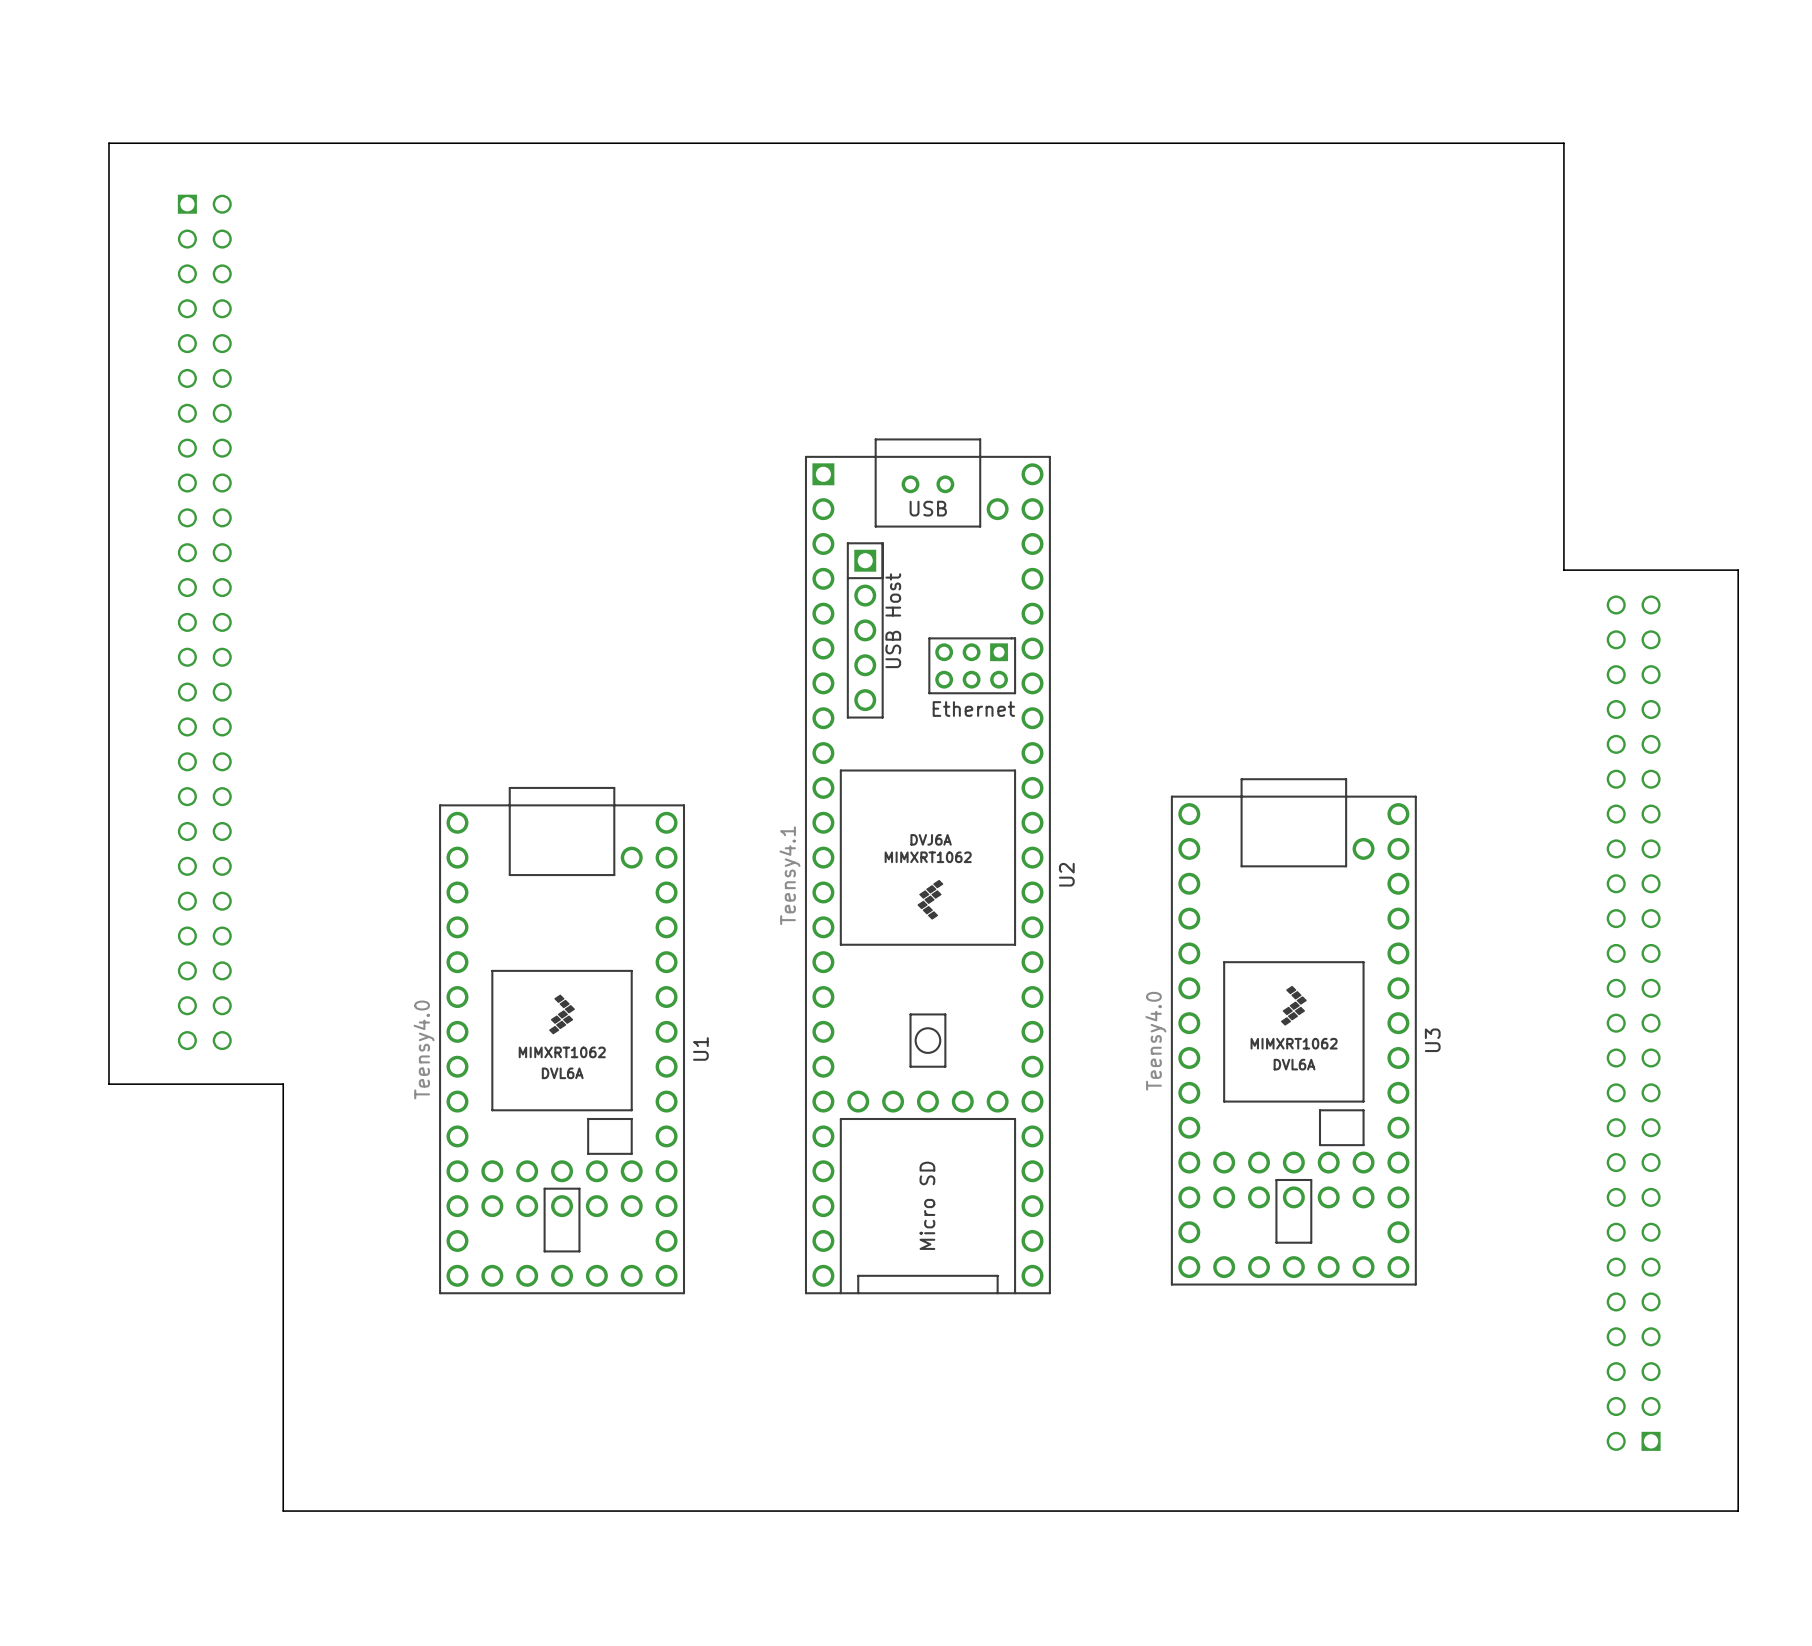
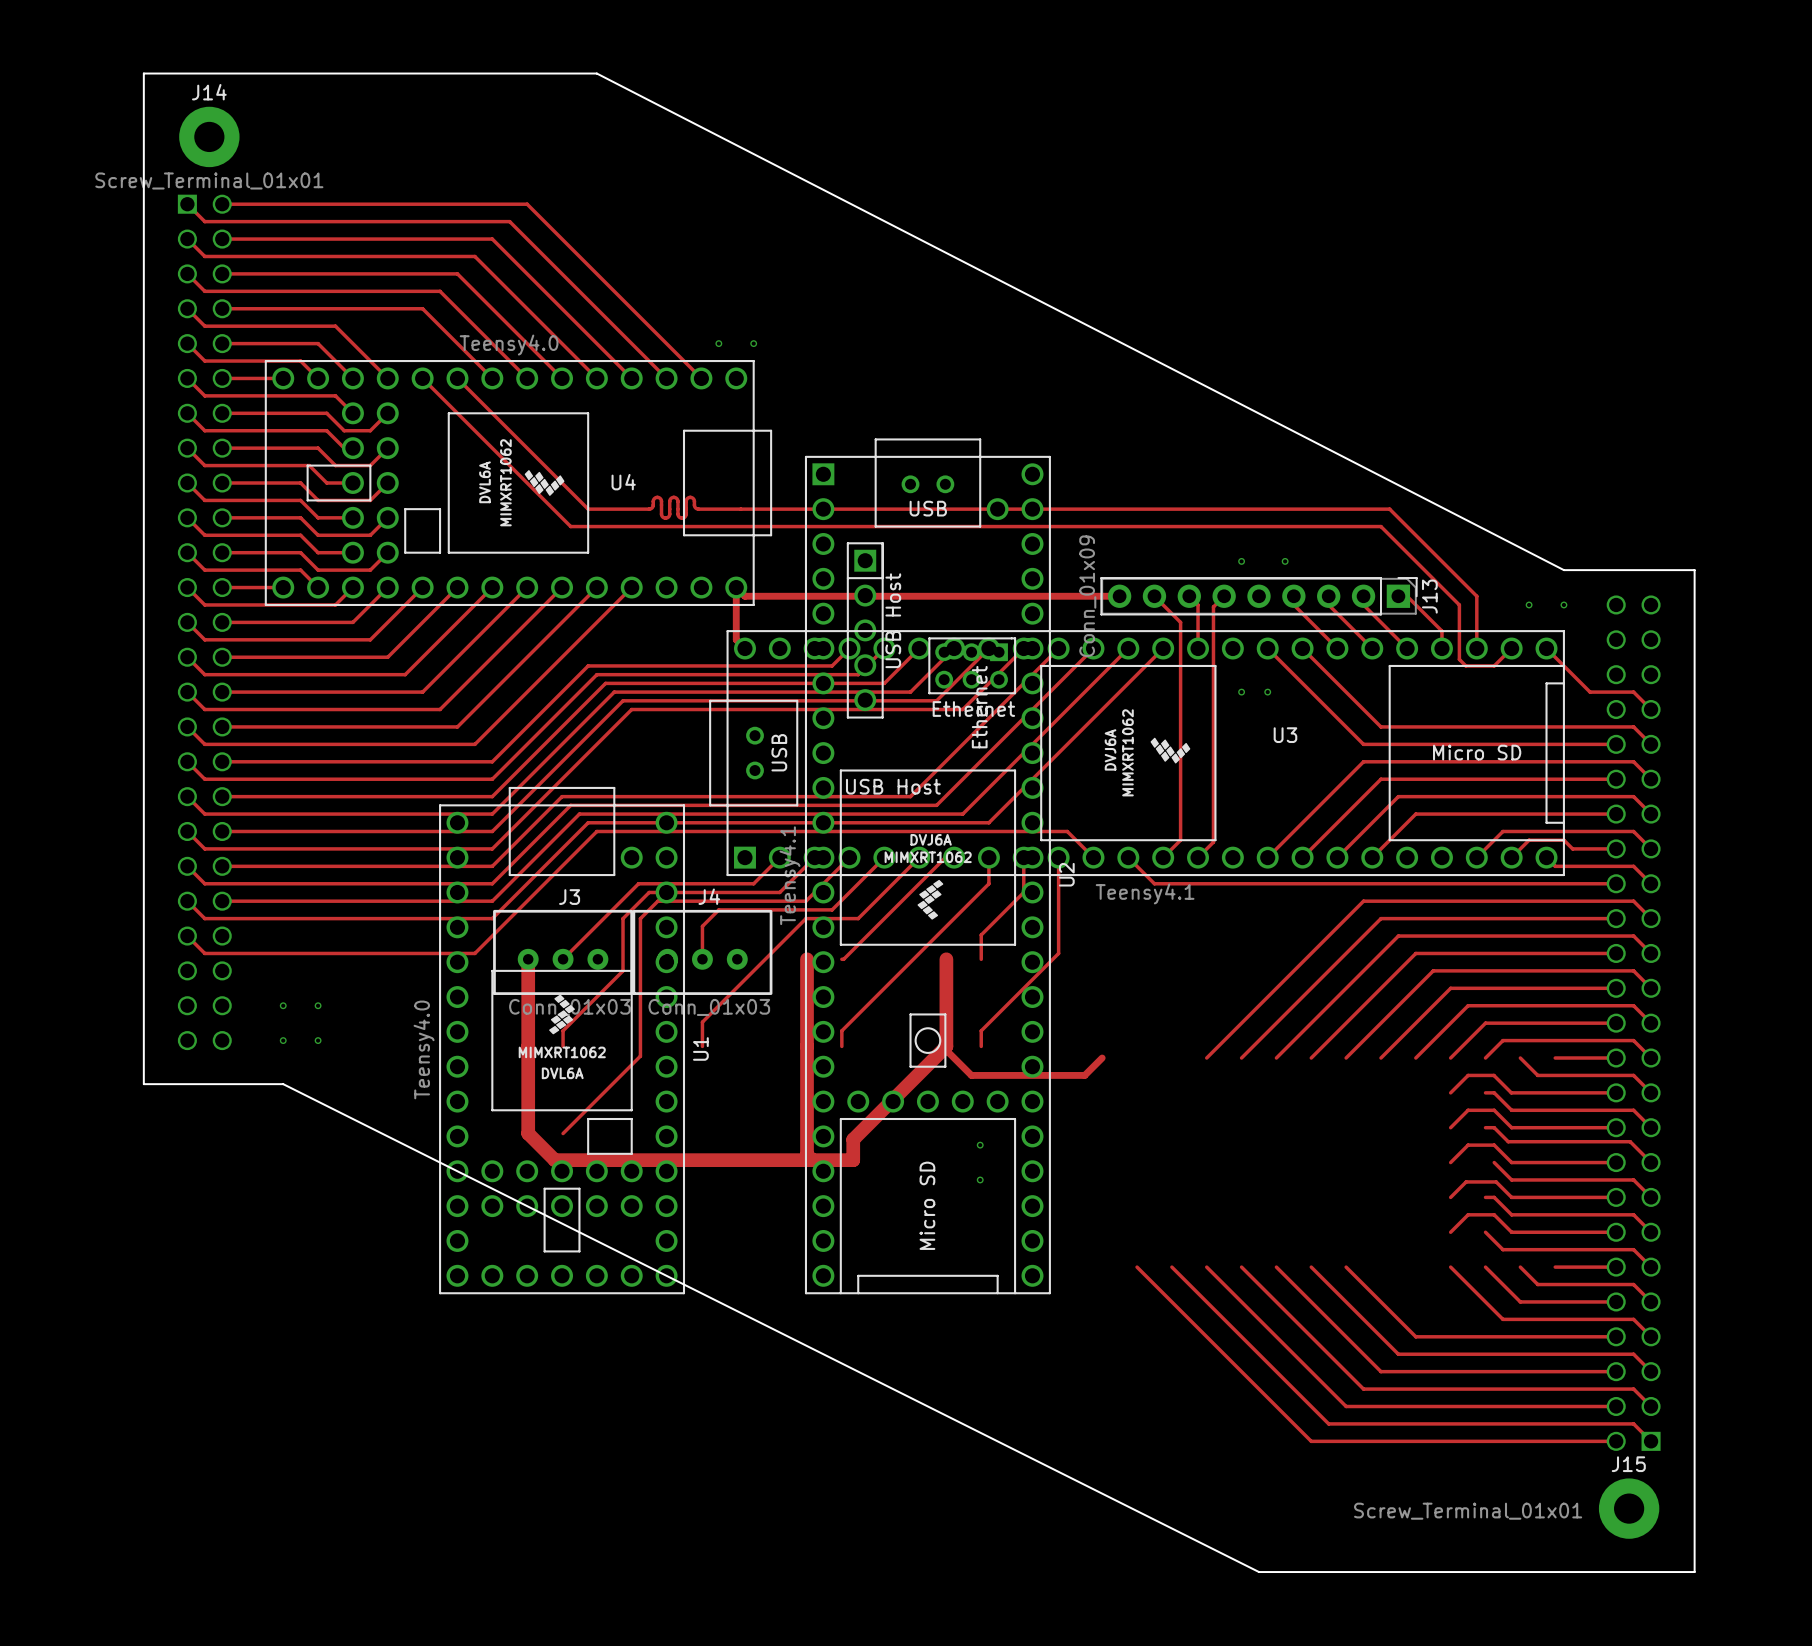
J14: none -> Screw_Terminal_01x01 (209, 136)
track: none -> (187, 204) (204, 221) (509, 221) (666, 378)
track: none -> (222, 204) (527, 204) (701, 378)
track: none -> (187, 239) (204, 256) (474, 256) (596, 378)
track: none -> (222, 239) (492, 239) (631, 378)
track: none -> (187, 273) (204, 291) (440, 291) (527, 378)
track: none -> (222, 273) (457, 273) (562, 378)
track: none -> (187, 308) (204, 326) (335, 326) (387, 378)
track: none -> (222, 308) (422, 308) (492, 378)
track: none -> (187, 343) (204, 361) (300, 361) (318, 378)
track: none -> (222, 343) (318, 343) (352, 378)
via: none -> (718, 343)
via: none -> (753, 343)
track: none -> (187, 378) (204, 395) (335, 395) (352, 413)
track: none -> (222, 378) (283, 378)
track: none -> (422, 378) (570, 526) (1380, 526) (1459, 604) (1459, 659) (1465, 665) (1494, 665) (1511, 648)
track: none -> (457, 378) (588, 509) (649, 509) (652, 506) (653, 499) (657, 497) (661, 500) (661, 515) (665, 518) (669, 515) (670, 499) (673, 497) (677, 499) (678, 515) (682, 518) (686, 515) (686, 499) (690, 497) (694, 499) (695, 507) (698, 509) (1389, 509) (1476, 596) (1476, 648)
track: none -> (187, 413) (204, 430) (326, 430) (344, 448) (352, 448)
track: none -> (222, 413) (326, 413) (344, 430) (370, 430) (387, 413)
track: none -> (187, 448) (204, 465) (309, 465) (326, 483) (352, 483)
track: none -> (222, 448) (318, 448) (335, 465) (370, 465) (387, 448)
track: none -> (187, 483) (204, 500) (300, 500) (318, 517) (352, 517)
track: none -> (222, 483) (300, 483) (318, 500) (370, 500) (387, 483)
U4: none -> Teensy4.0 (518, 483)
track: none -> (187, 517) (204, 535) (300, 535) (318, 552) (352, 552)
track: none -> (222, 517) (300, 517) (318, 535) (370, 535) (387, 517)
track: none -> (187, 552) (204, 570) (300, 570) (318, 587)
track: none -> (222, 552) (300, 552) (318, 570) (370, 570) (387, 552)
via: none -> (1241, 561)
via: none -> (1285, 561)
board edge: (1563, 570) (1563, 143) (108, 143) (108, 1084) (143, 1084) -> (1563, 570) (596, 73) (143, 73) (143, 1084)
board edge: (1694, 570) (1738, 570) (1738, 1511) (283, 1511) (283, 1084) -> (1694, 570) (1694, 1572) (1259, 1572) (283, 1084)
track: none -> (187, 587) (204, 604) (335, 604) (352, 587)
track: none -> (222, 587) (283, 587)
track: none -> (387, 587) (352, 622) (222, 622)
track: none -> (422, 587) (370, 639) (204, 639) (187, 622)
track: none -> (457, 587) (387, 657) (222, 657)
track: none -> (492, 587) (405, 674) (204, 674) (187, 657)
track: none -> (527, 587) (422, 692) (222, 692)
track: none -> (562, 587) (440, 709) (204, 709) (187, 692)
track: none -> (596, 587) (457, 726) (222, 726)
track: none -> (631, 587) (474, 744) (204, 744) (187, 726)
track: none -> (1119, 596) (744, 596) (736, 587) (736, 639) (744, 648)
track: none -> (1154, 596) (1180, 622) (1180, 840) (1163, 857)
track: none -> (1189, 596) (1198, 604) (1198, 648)
track: none -> (1224, 596) (1213, 606) (1213, 842) (1198, 857)
J13: none -> Conn_01x09 (1259, 596)
track: none -> (1293, 596) (1293, 604) (1337, 648)
track: none -> (1328, 596) (1328, 604) (1372, 648)
track: none -> (1363, 596) (1363, 604) (1407, 648)
track: none -> (1398, 596) (1407, 596) (1441, 631) (1441, 648)
via: none -> (1529, 604)
via: none -> (1563, 604)
track: none -> (849, 648) (832, 665) (588, 665) (492, 761) (222, 761)
track: none -> (884, 648) (858, 674) (596, 674) (492, 779) (204, 779) (187, 761)
track: none -> (919, 648) (884, 683) (605, 683) (492, 796) (222, 796)
track: none -> (954, 648) (910, 692) (614, 692) (492, 814) (204, 814) (187, 796)
track: none -> (988, 648) (936, 700) (623, 700) (492, 831) (222, 831)
track: none -> (1023, 648) (962, 709) (631, 709) (492, 848) (204, 848) (187, 831)
track: none -> (1058, 648) (910, 796) (562, 796) (492, 866) (222, 866)
track: none -> (1093, 648) (936, 805) (570, 805) (492, 883) (204, 883) (187, 866)
track: none -> (1128, 648) (962, 814) (579, 814) (492, 901) (222, 901)
track: none -> (1163, 648) (988, 822) (588, 822) (492, 918) (204, 918) (187, 901)
track: none -> (1267, 648) (1363, 744) (1616, 744)
track: none -> (1302, 648) (1380, 726) (1633, 726) (1651, 744)
track: none -> (1546, 648) (1590, 692) (1633, 692) (1651, 709)
via: none -> (1241, 692)
via: none -> (1267, 692)
U3 footprint: [1170, 778, 1417, 1286] -> [709, 630, 1565, 877]
track: none -> (1616, 779) (1380, 779) (1302, 857)
track: none -> (1651, 779) (1633, 761) (1363, 761) (1267, 857)
track: none -> (1616, 814) (1415, 814) (1372, 857)
track: none -> (1651, 814) (1633, 796) (1398, 796) (1337, 857)
track: none -> (1616, 848) (1572, 848) (1563, 840) (1529, 840) (1511, 857)
track: none -> (1651, 848) (1633, 831) (1502, 831) (1476, 857)
track: none -> (779, 857) (753, 883) (638, 883) (563, 959)
track: none -> (814, 857) (779, 892) (649, 892) (623, 918) (623, 970) (563, 1030) (563, 1046)
track: none -> (849, 857) (805, 901) (657, 901) (640, 918) (640, 1056) (563, 1133)
track: none -> (884, 857) (832, 909) (718, 909) (702, 926) (702, 959)
track: none -> (919, 857) (858, 918) (805, 918) (702, 1022) (702, 1046)
track: none -> (954, 857) (945, 857) (841, 959)
track: none -> (988, 857) (988, 883) (841, 1030) (841, 1046)
track: none -> (1023, 857) (1023, 892) (981, 935) (981, 959)
track: none -> (1058, 857) (1058, 953) (981, 1030) (981, 1046)
track: none -> (1093, 857) (1067, 831) (596, 831) (474, 953) (204, 953) (187, 936)
track: none -> (1128, 857) (1154, 883) (1616, 883)
track: none -> (1546, 857) (1555, 866) (1633, 866) (1651, 883)
track: none -> (1616, 918) (1380, 918) (1241, 1058)
track: none -> (1651, 918) (1633, 901) (1363, 901) (1206, 1058)
J3: none -> Conn_01x03 (563, 952)
J4: none -> Conn_01x03 (702, 952)
track: none -> (1616, 953) (1415, 953) (1311, 1058)
track: none -> (1651, 953) (1633, 936) (1398, 936) (1276, 1058)
track: none -> (528, 959) (528, 1133) (554, 1160) (853, 1160) (853, 1139) (946, 1046)
track: none -> (807, 959) (807, 1154) (812, 1160)
track: none -> (946, 959) (946, 1046)
track: none -> (1616, 988) (1450, 988) (1380, 1058)
track: none -> (1651, 988) (1633, 970) (1433, 970) (1346, 1058)
via: none -> (283, 1005)
via: none -> (318, 1005)
track: none -> (1616, 1023) (1485, 1023) (1450, 1058)
track: none -> (1651, 1023) (1633, 1005) (1468, 1005) (1415, 1058)
via: none -> (283, 1040)
via: none -> (318, 1040)
U3 value: Teensy4.0 (1155, 1041) -> Teensy4.1 (1145, 893)
track: none -> (946, 1046) (946, 1050) (971, 1075) (1084, 1075) (1102, 1058)
track: none -> (1485, 1058) (1502, 1040) (1633, 1040) (1651, 1058)
track: none -> (1520, 1058) (1537, 1075) (1633, 1075) (1651, 1092)
track: none -> (1555, 1058) (1616, 1058)
track: none -> (1450, 1092) (1468, 1075) (1493, 1075) (1511, 1092) (1616, 1092)
track: none -> (1485, 1092) (1494, 1092) (1511, 1110) (1633, 1110) (1651, 1127)
track: none -> (1450, 1127) (1468, 1110) (1494, 1110) (1511, 1127) (1616, 1127)
track: none -> (1485, 1127) (1494, 1127) (1508, 1141) (1630, 1141) (1651, 1162)
via: none -> (980, 1145)
track: none -> (1450, 1162) (1468, 1145) (1494, 1145) (1511, 1162) (1616, 1162)
track: none -> (1494, 1162) (1511, 1179) (1633, 1179) (1651, 1197)
via: none -> (980, 1179)
track: none -> (1450, 1197) (1466, 1181) (1496, 1181) (1511, 1197) (1616, 1197)
track: none -> (1485, 1197) (1494, 1197) (1511, 1214) (1633, 1214) (1651, 1232)
track: none -> (1450, 1232) (1468, 1214) (1494, 1214) (1511, 1232) (1616, 1232)
track: none -> (1485, 1232) (1502, 1249) (1633, 1249) (1651, 1267)
track: none -> (1137, 1267) (1311, 1441) (1616, 1441)
track: none -> (1171, 1267) (1328, 1423) (1633, 1423) (1651, 1441)
track: none -> (1206, 1267) (1346, 1406) (1616, 1406)
track: none -> (1241, 1267) (1363, 1389) (1633, 1389) (1651, 1406)
track: none -> (1276, 1267) (1380, 1371) (1616, 1371)
track: none -> (1311, 1267) (1398, 1354) (1633, 1354) (1651, 1371)
track: none -> (1346, 1267) (1415, 1336) (1616, 1336)
track: none -> (1450, 1267) (1502, 1319) (1633, 1319) (1651, 1336)
track: none -> (1485, 1267) (1520, 1301) (1616, 1301)
track: none -> (1520, 1267) (1537, 1284) (1633, 1284) (1651, 1301)
track: none -> (1555, 1267) (1616, 1267)
J15: none -> Screw_Terminal_01x01 (1629, 1508)

